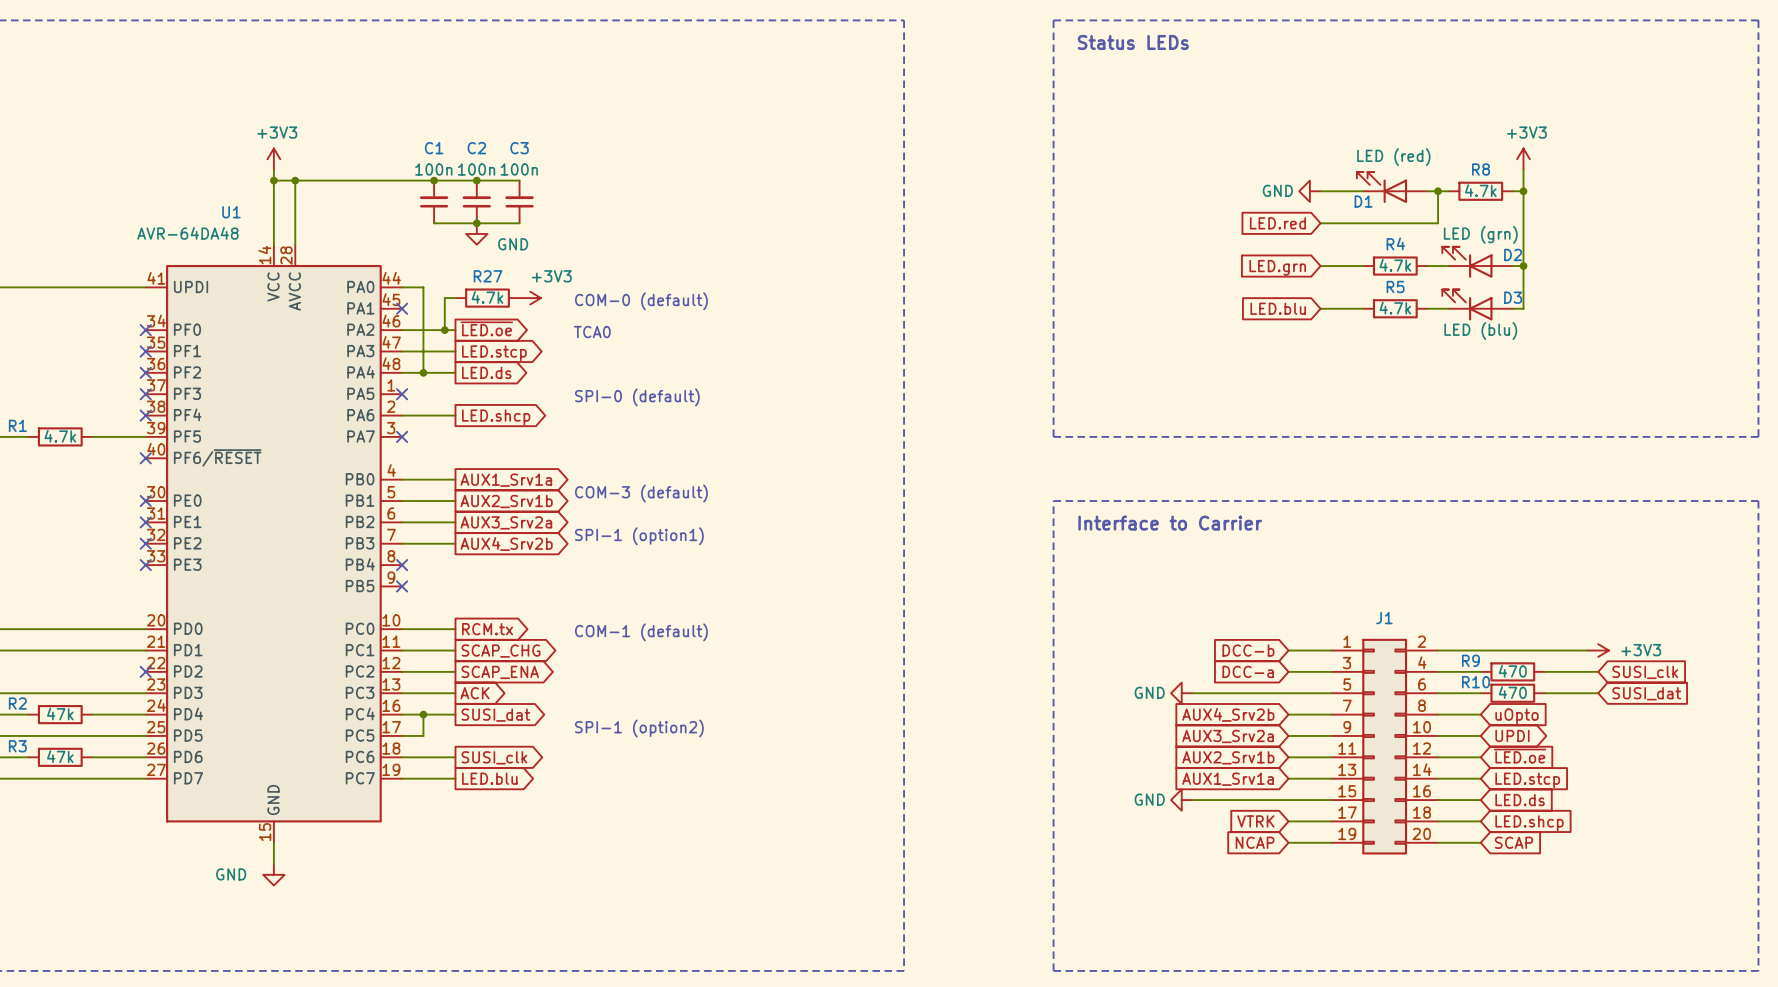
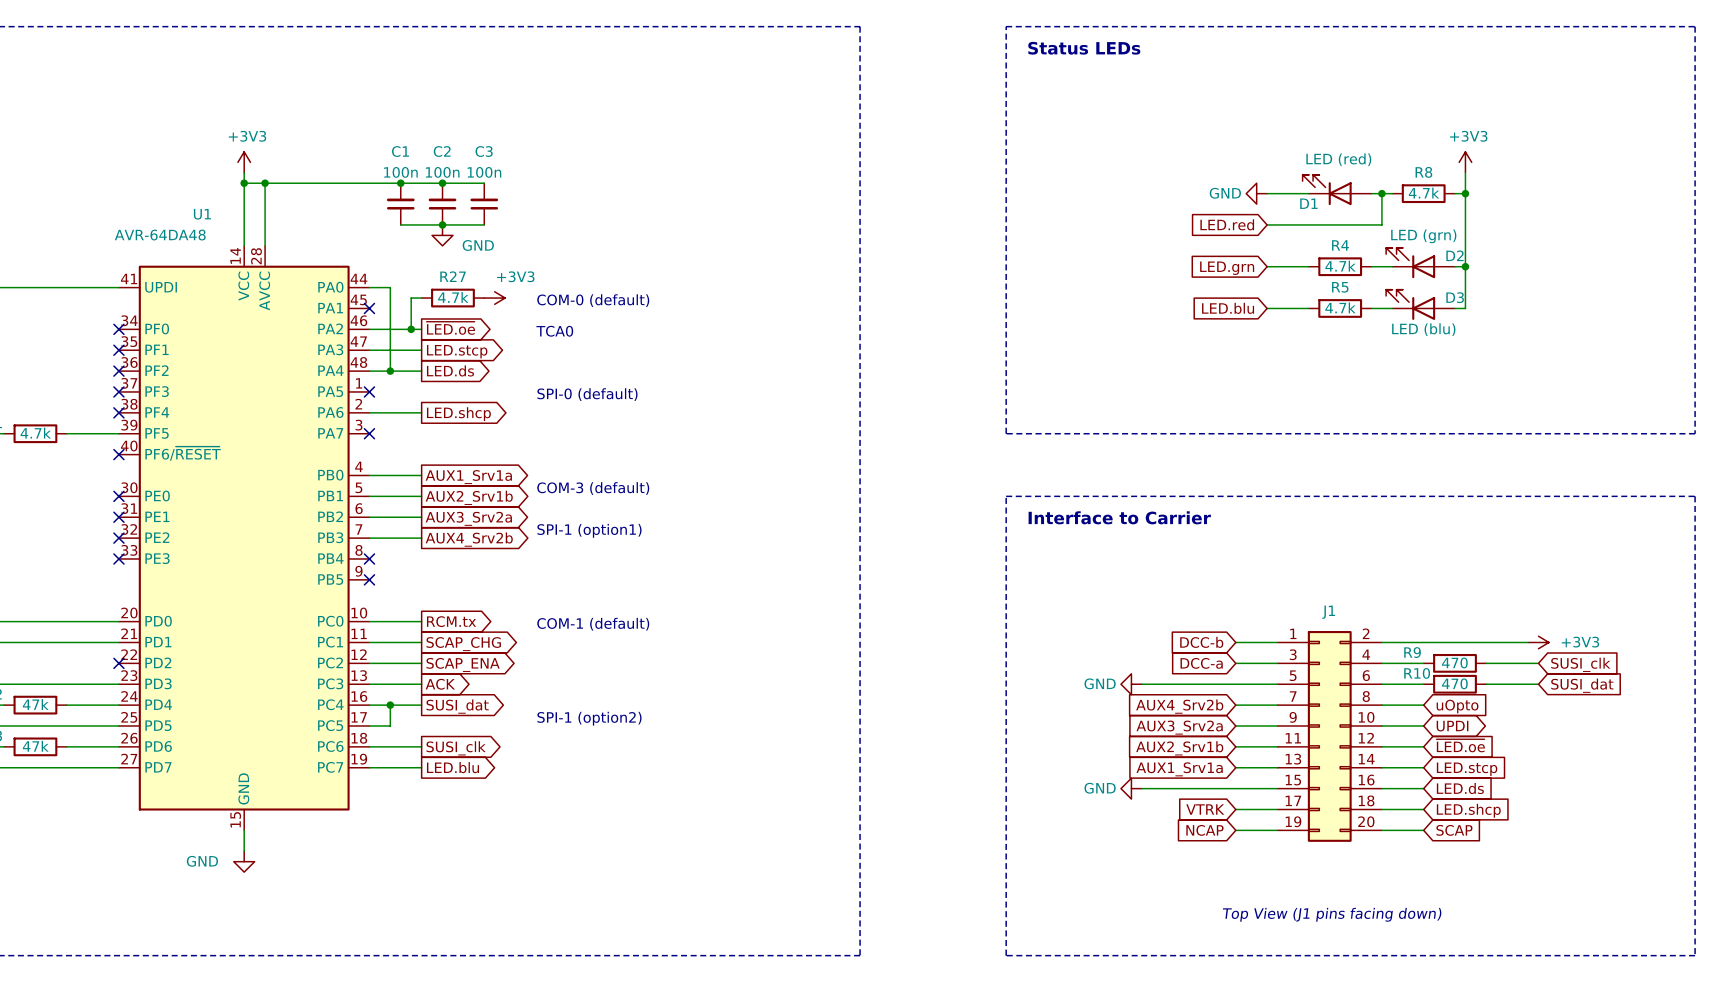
text: none -> Top View (J1 pins facing down) (1332, 914)

